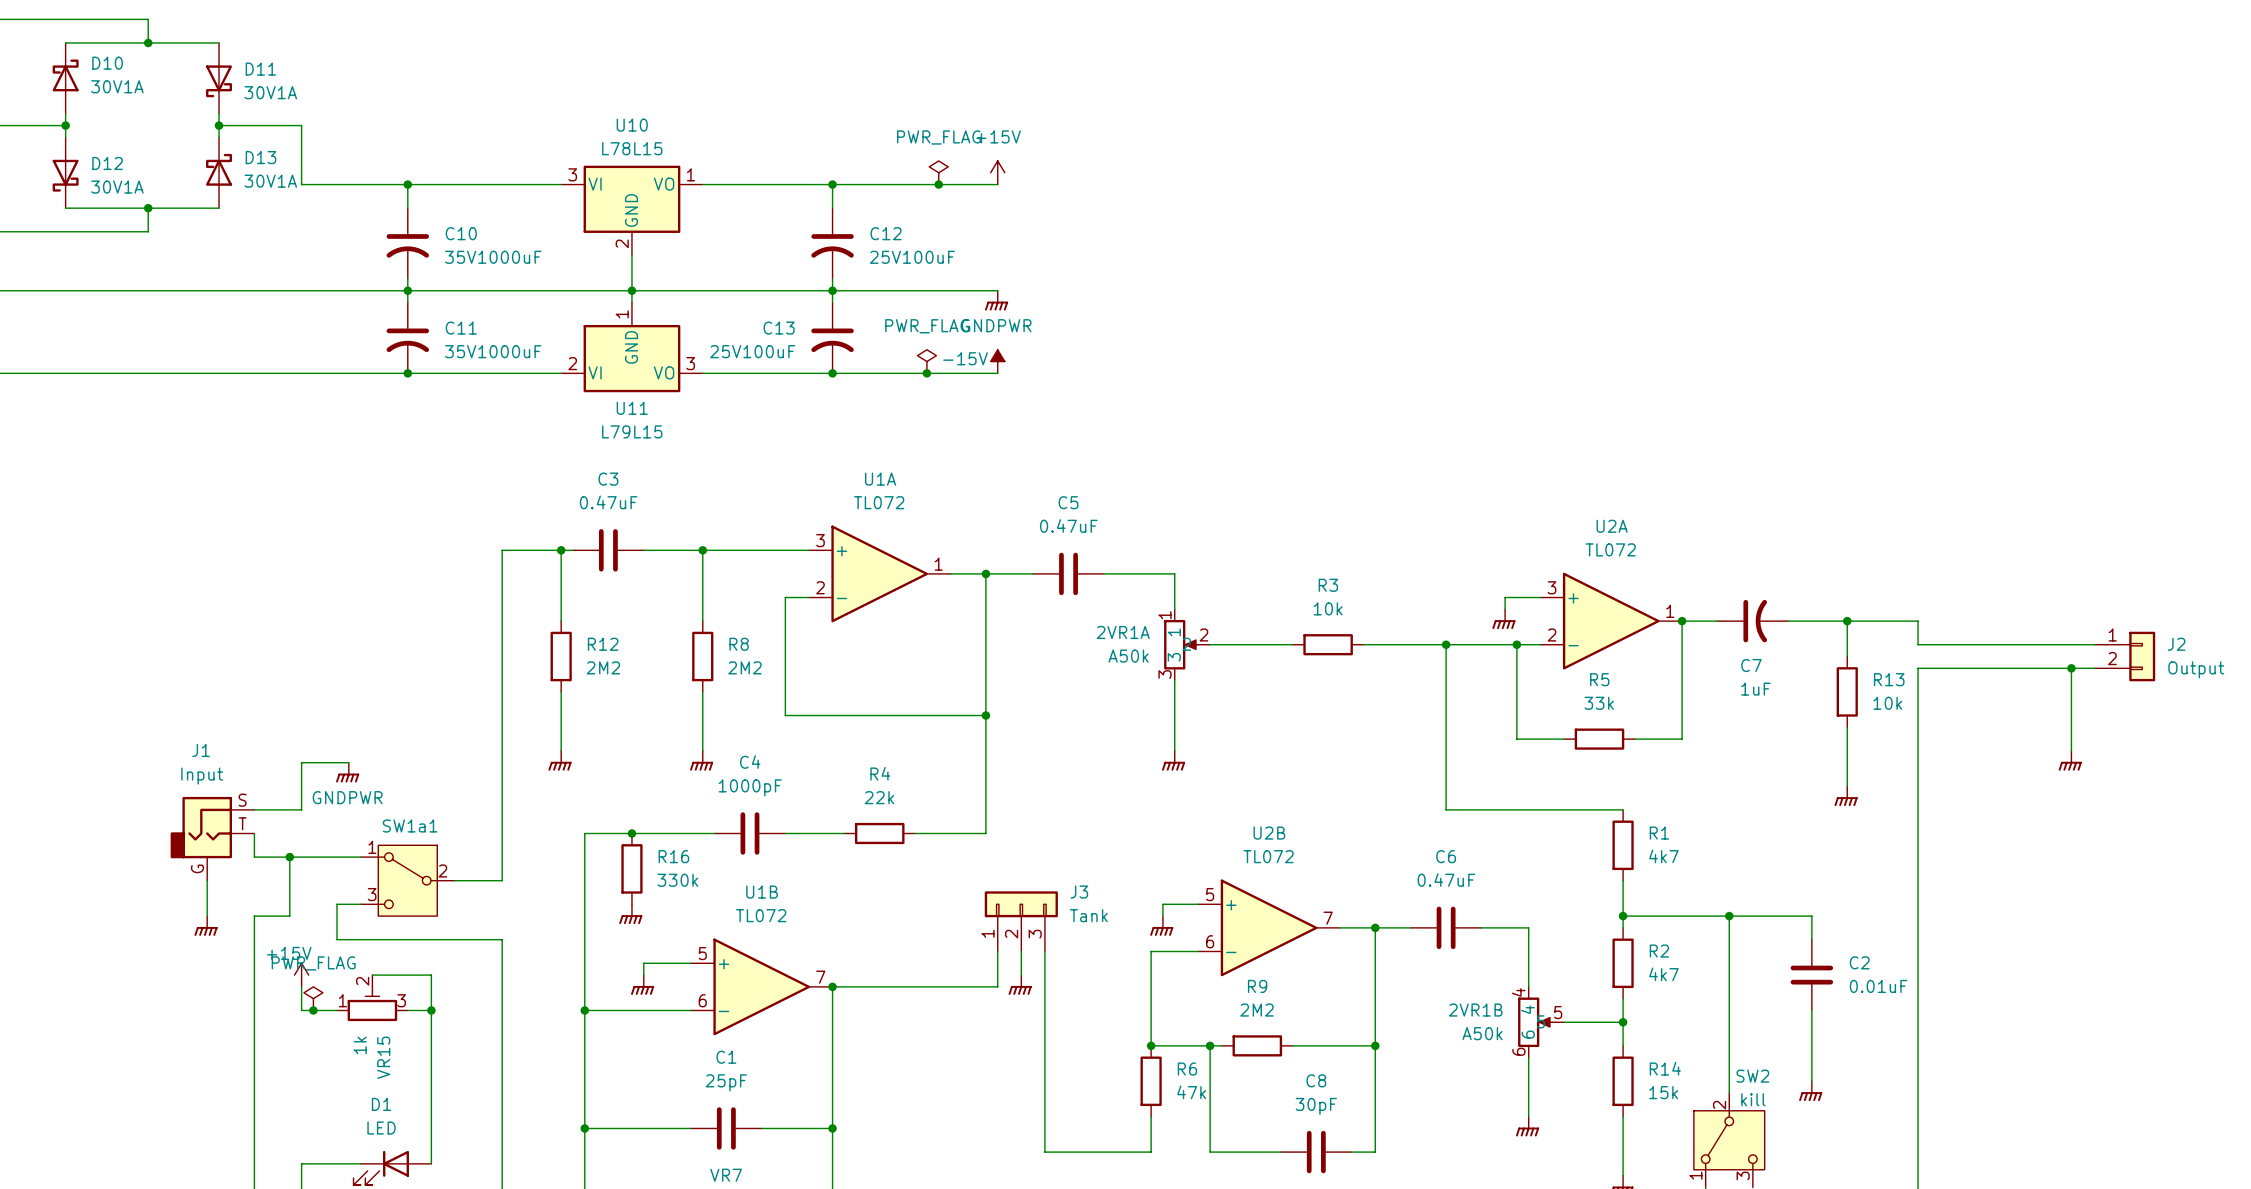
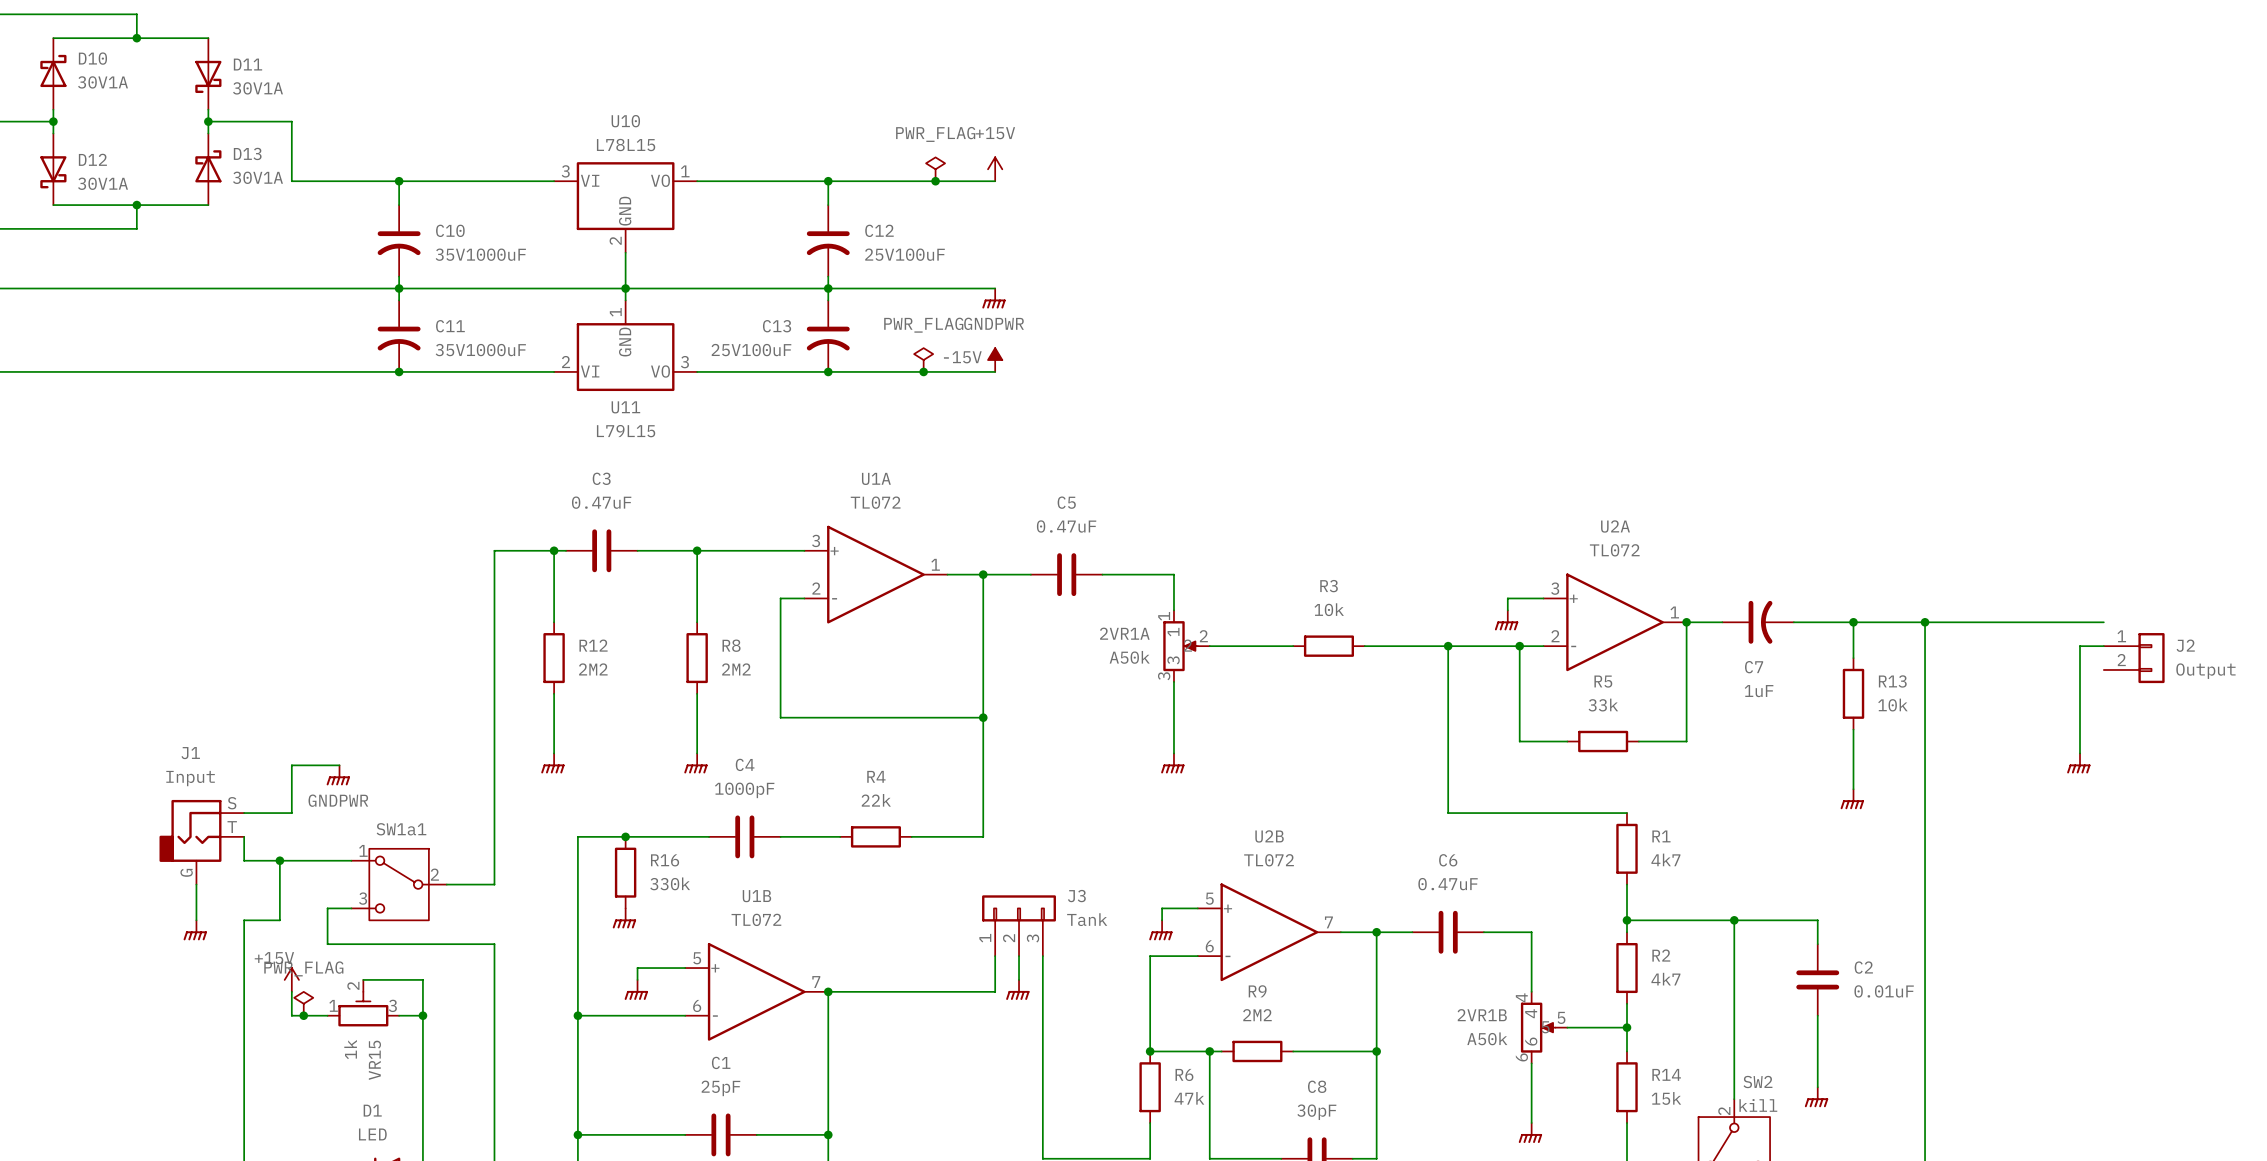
junction: none -> (1925, 622)
wire: (1918, 644) (2071, 644) -> (1925, 646) (1925, 669)
wire: none -> (2080, 646) (2080, 669)
wire: (1918, 668) (2095, 668) -> (1925, 622) (2103, 622)
junction: (2071, 668) -> none

